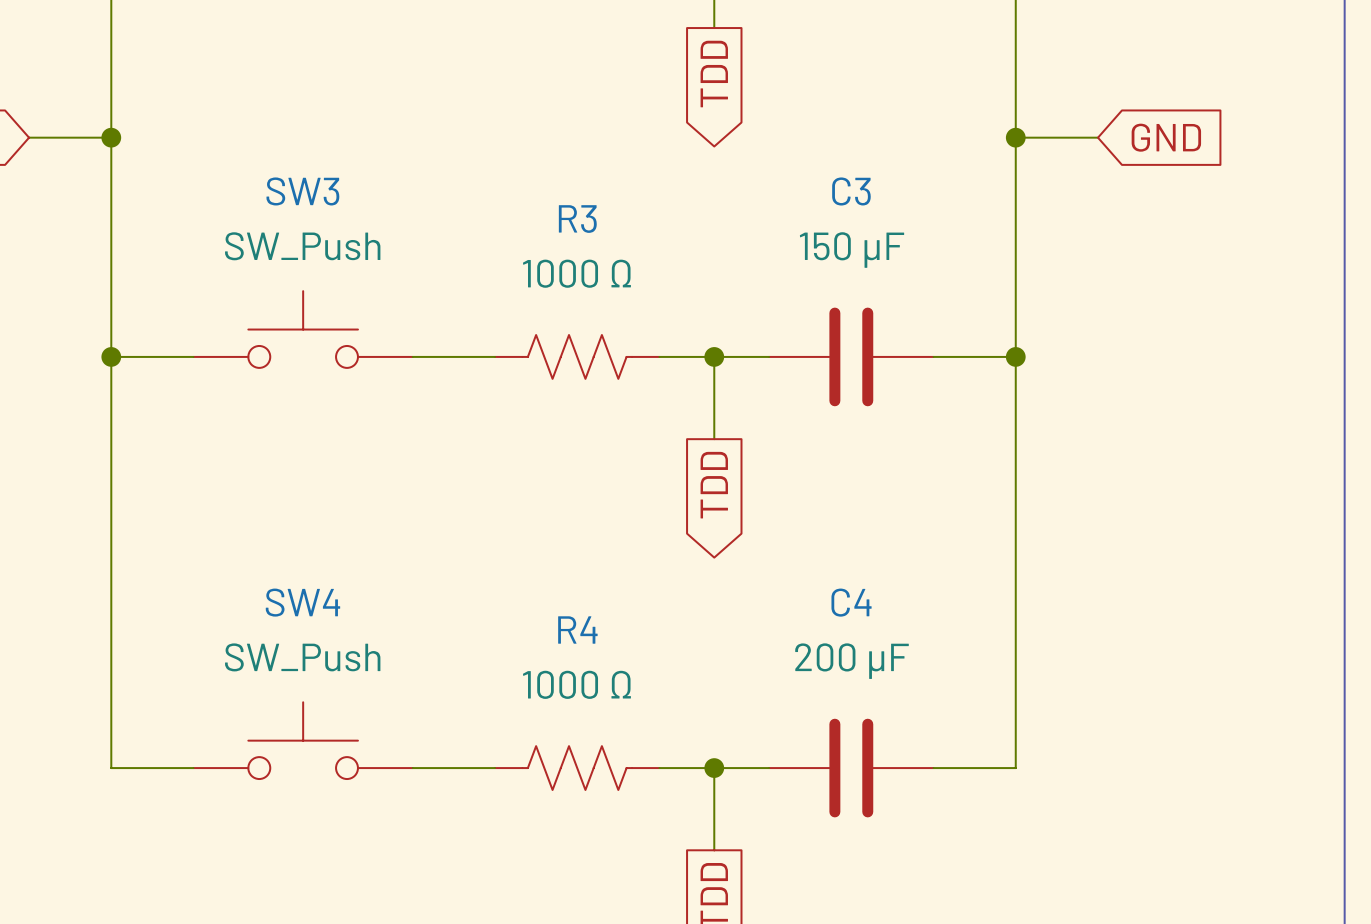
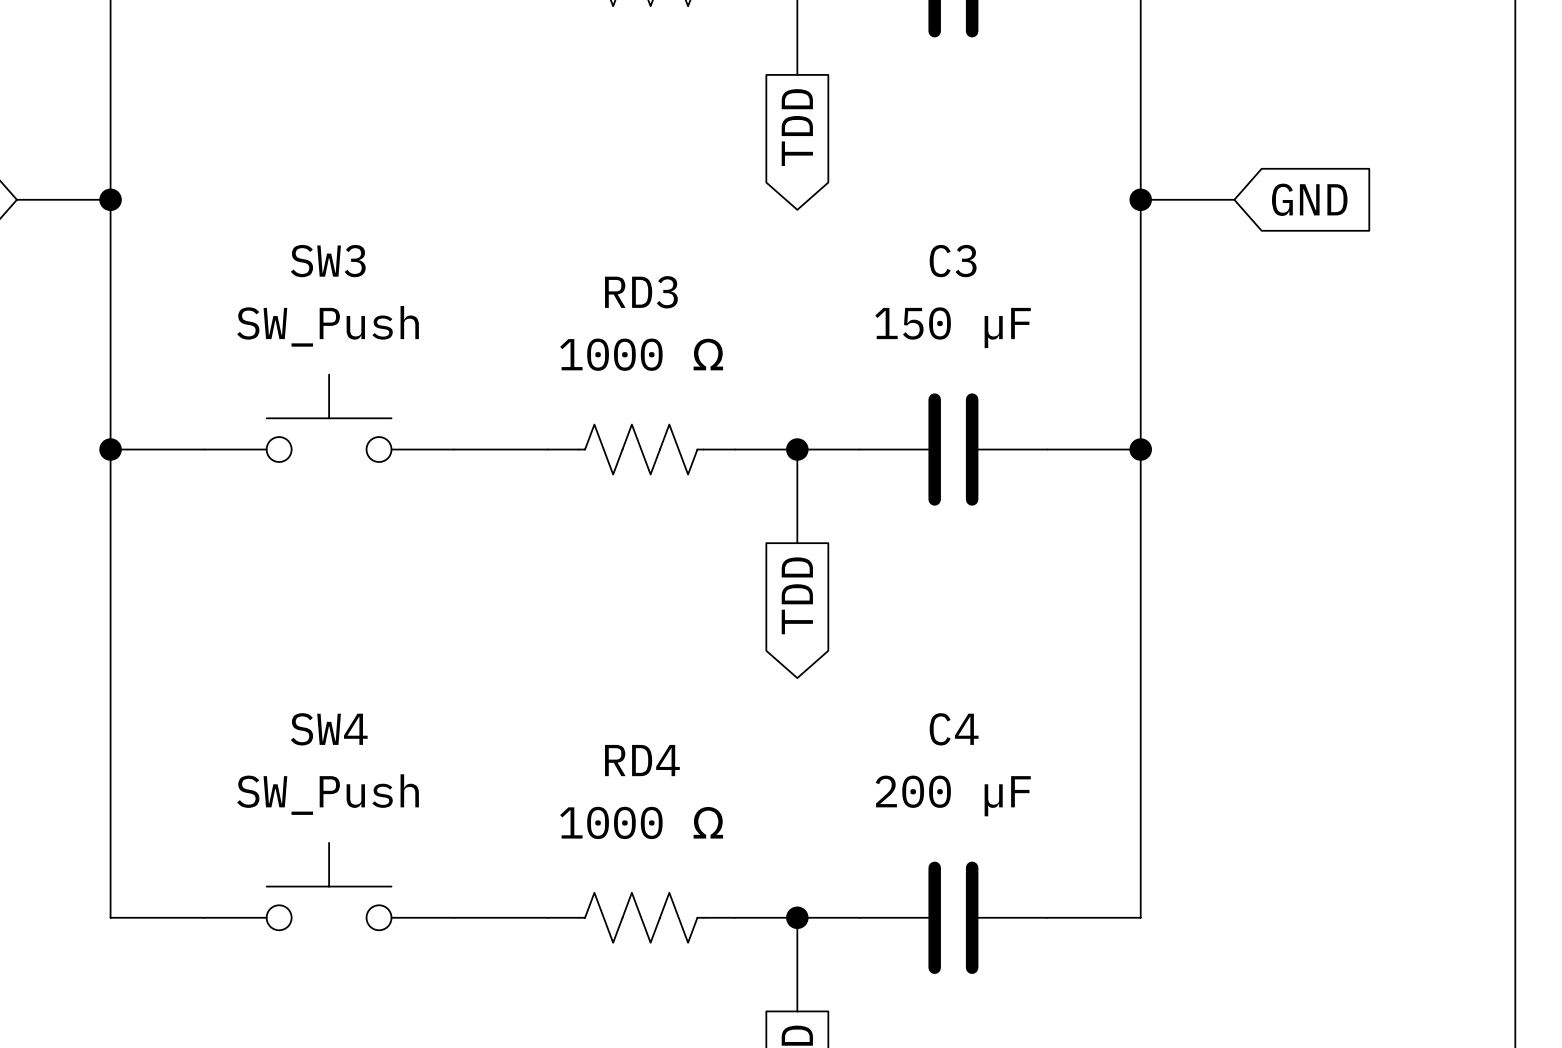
R3 name: R3 (577, 219) -> RD3 (641, 292)
R4 name: R4 (577, 629) -> RD4 (642, 760)

